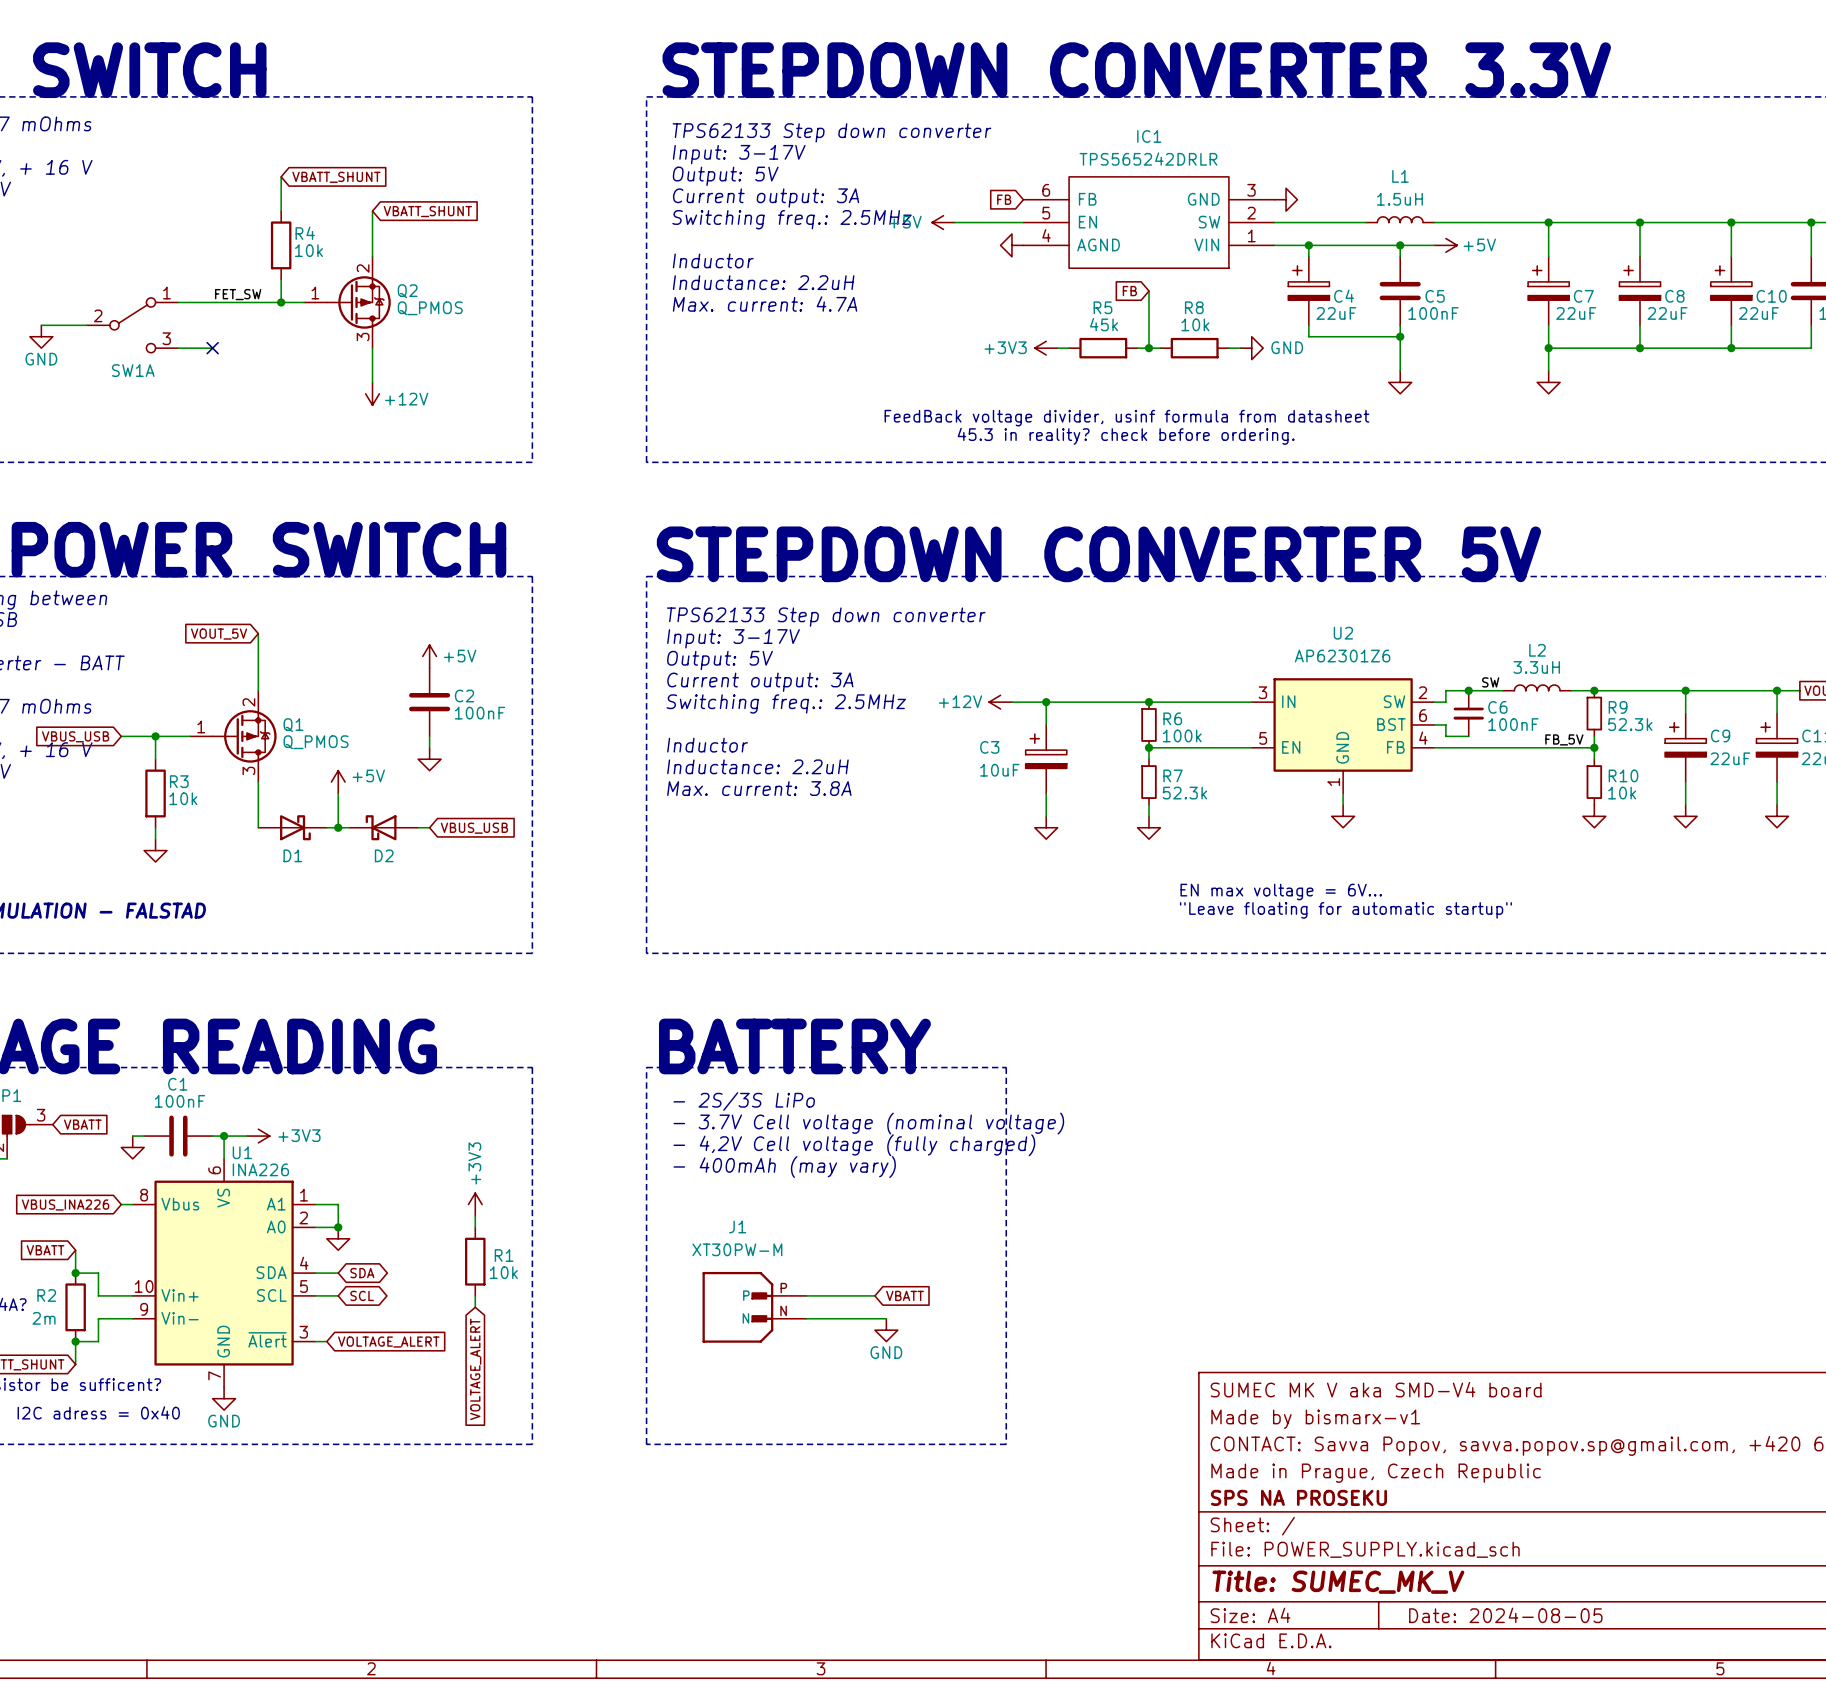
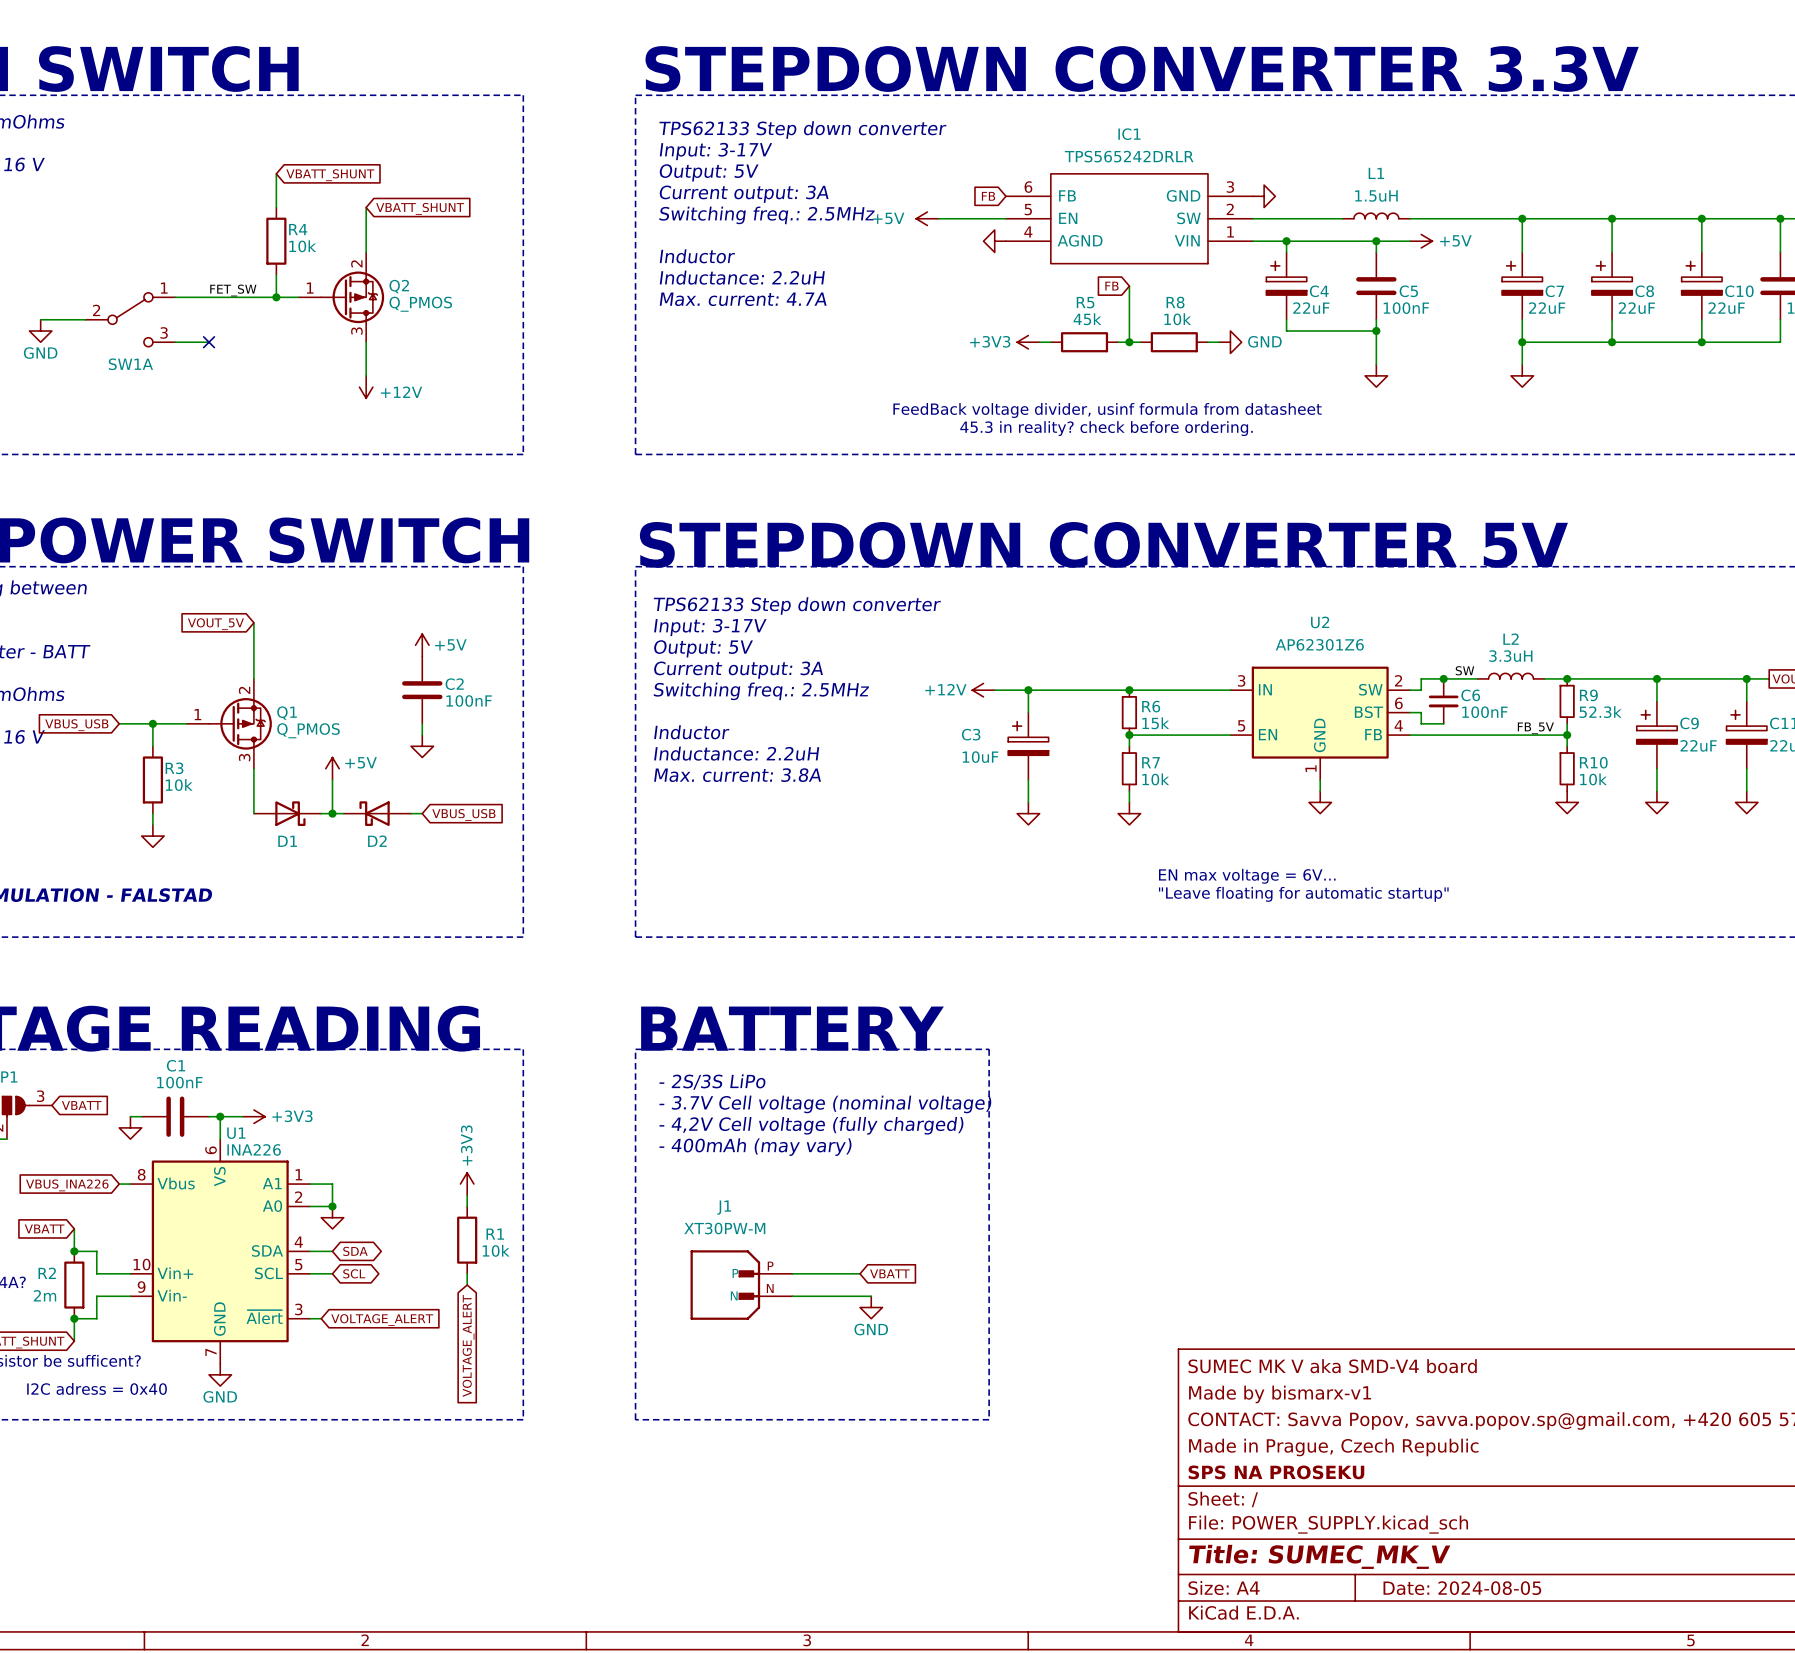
R6 value: 100k (1182, 735) -> 15k (1155, 723)
R7 value: 52.3k (1184, 793) -> 10k (1155, 779)

